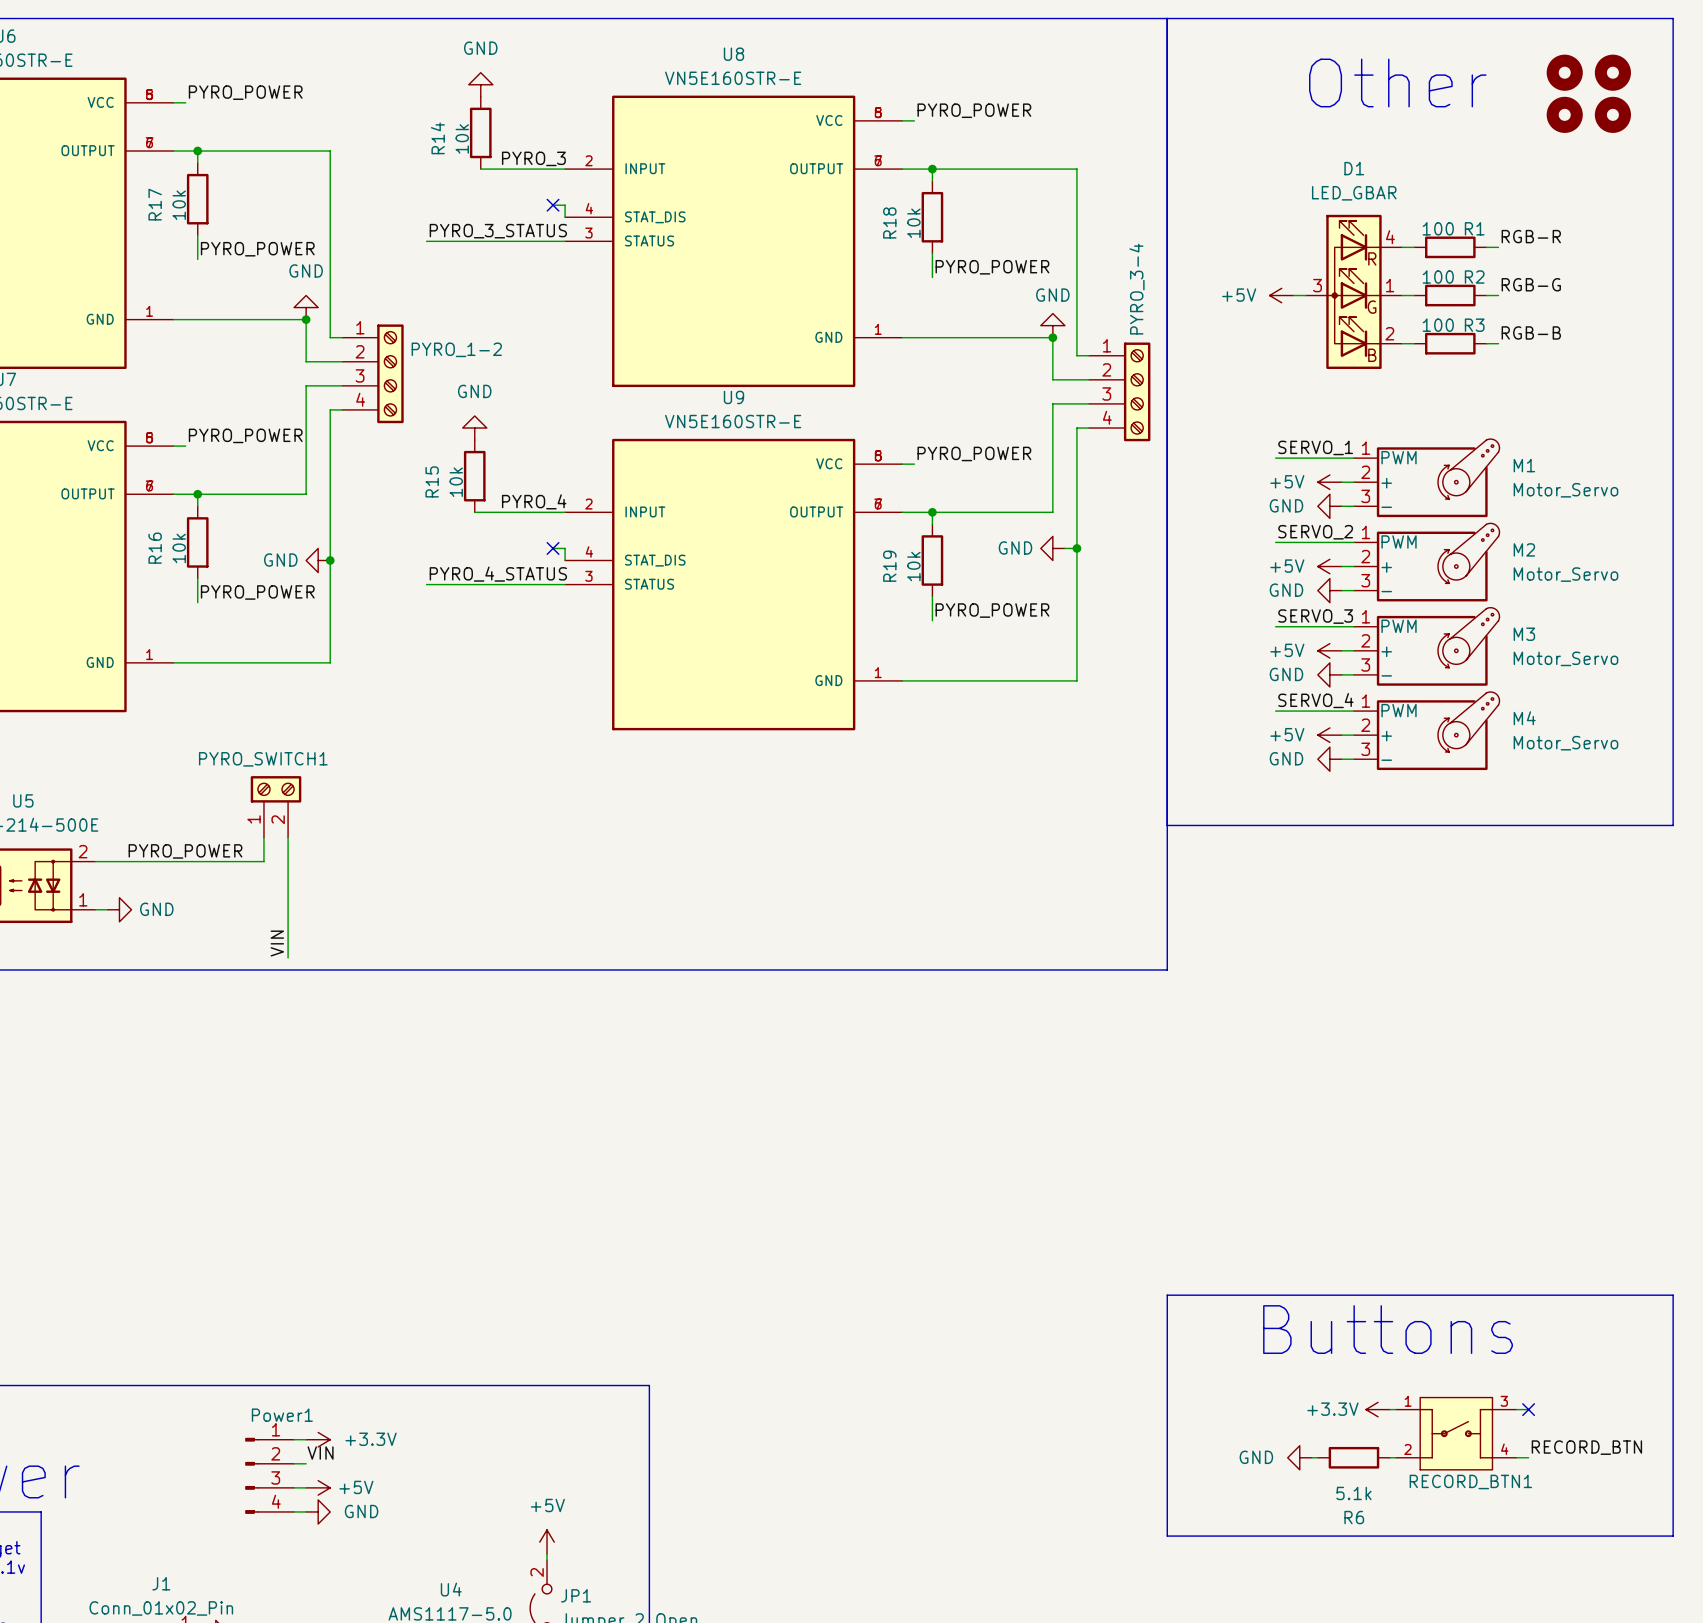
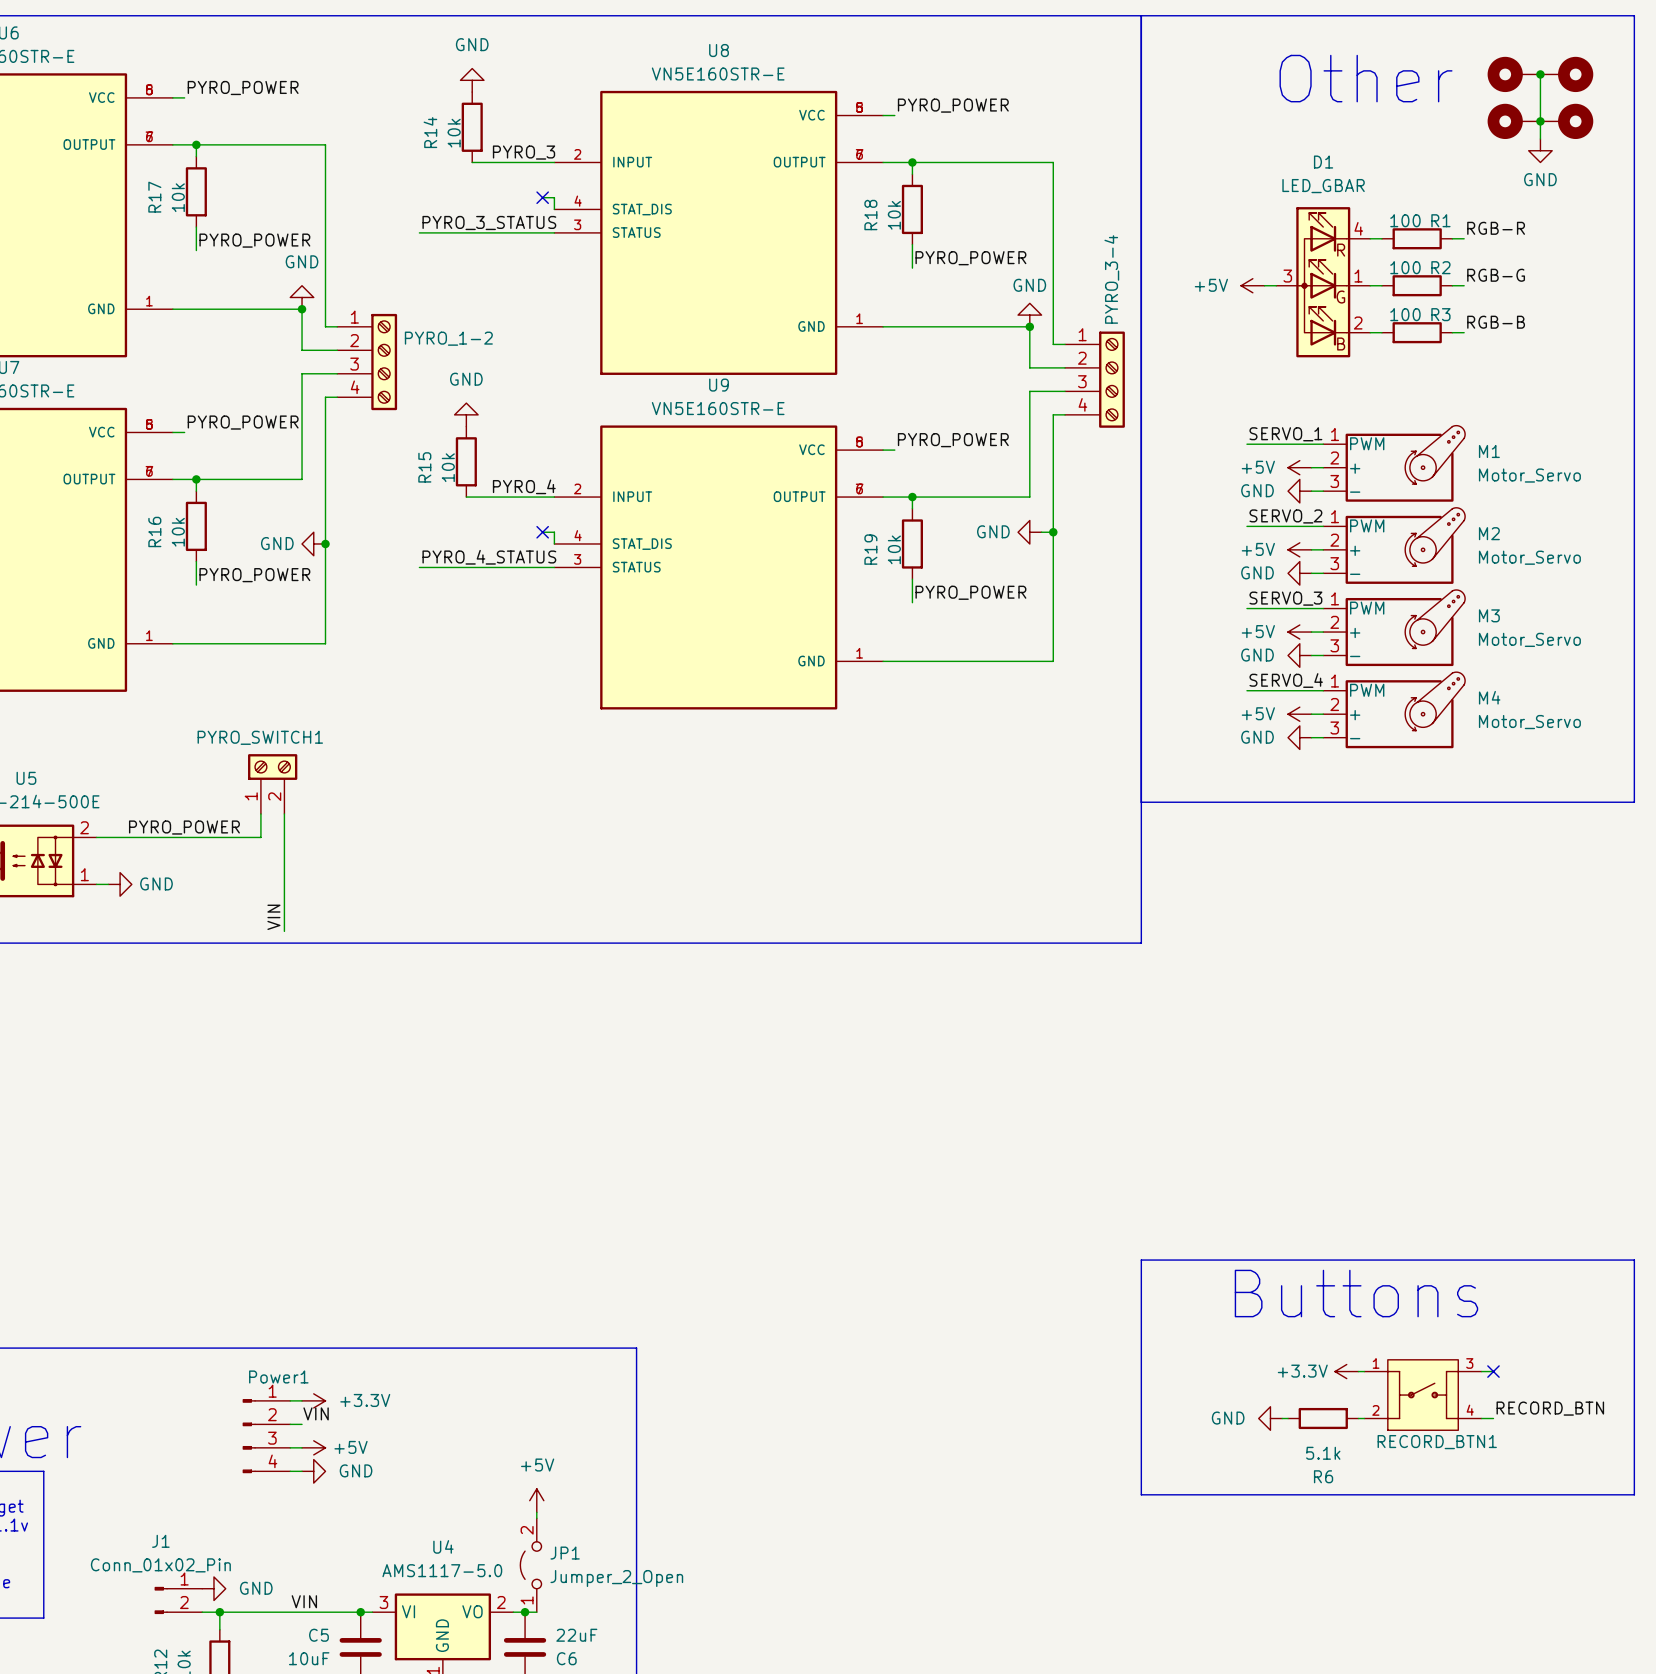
part: (1564, 72) -> none
part: (1612, 72) -> none
part: none -> (1514, 74)
wire: none -> (1540, 74) (1540, 139)
junction: none -> (1540, 74)
part: none -> (1566, 74)
part: (1564, 114) -> none
part: (1612, 114) -> none
part: none -> (1514, 121)
junction: none -> (1540, 121)
part: none -> (1566, 121)
power symbol: none -> GND (1540, 150)

